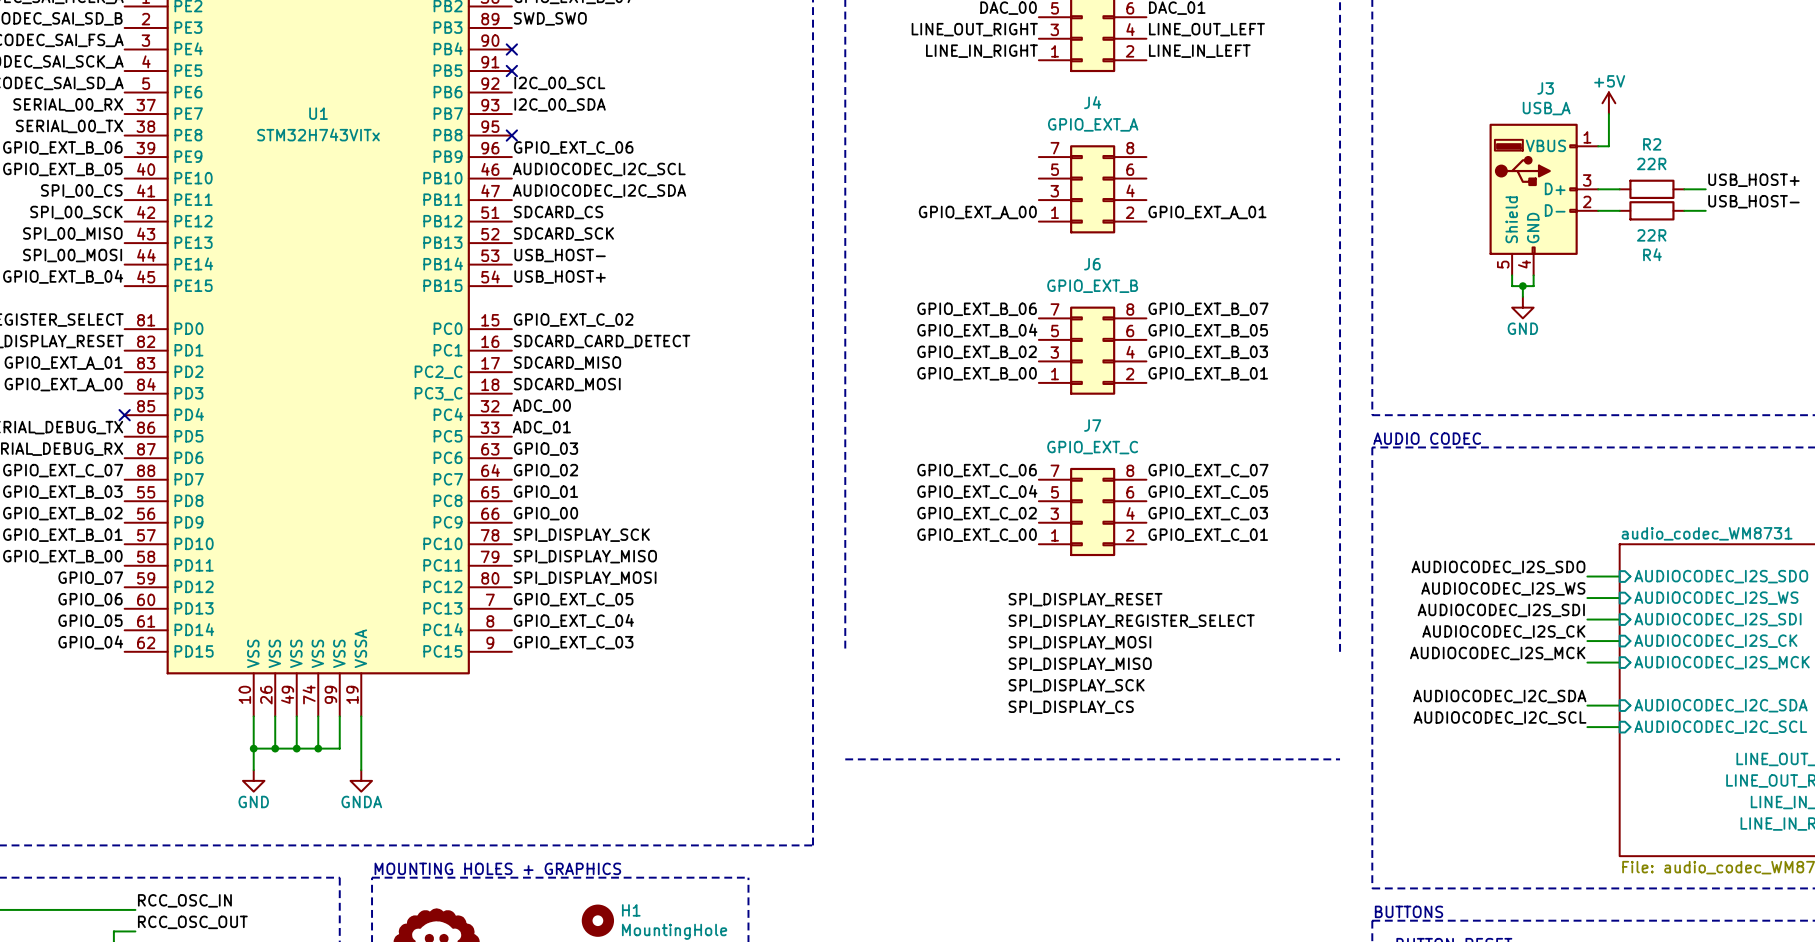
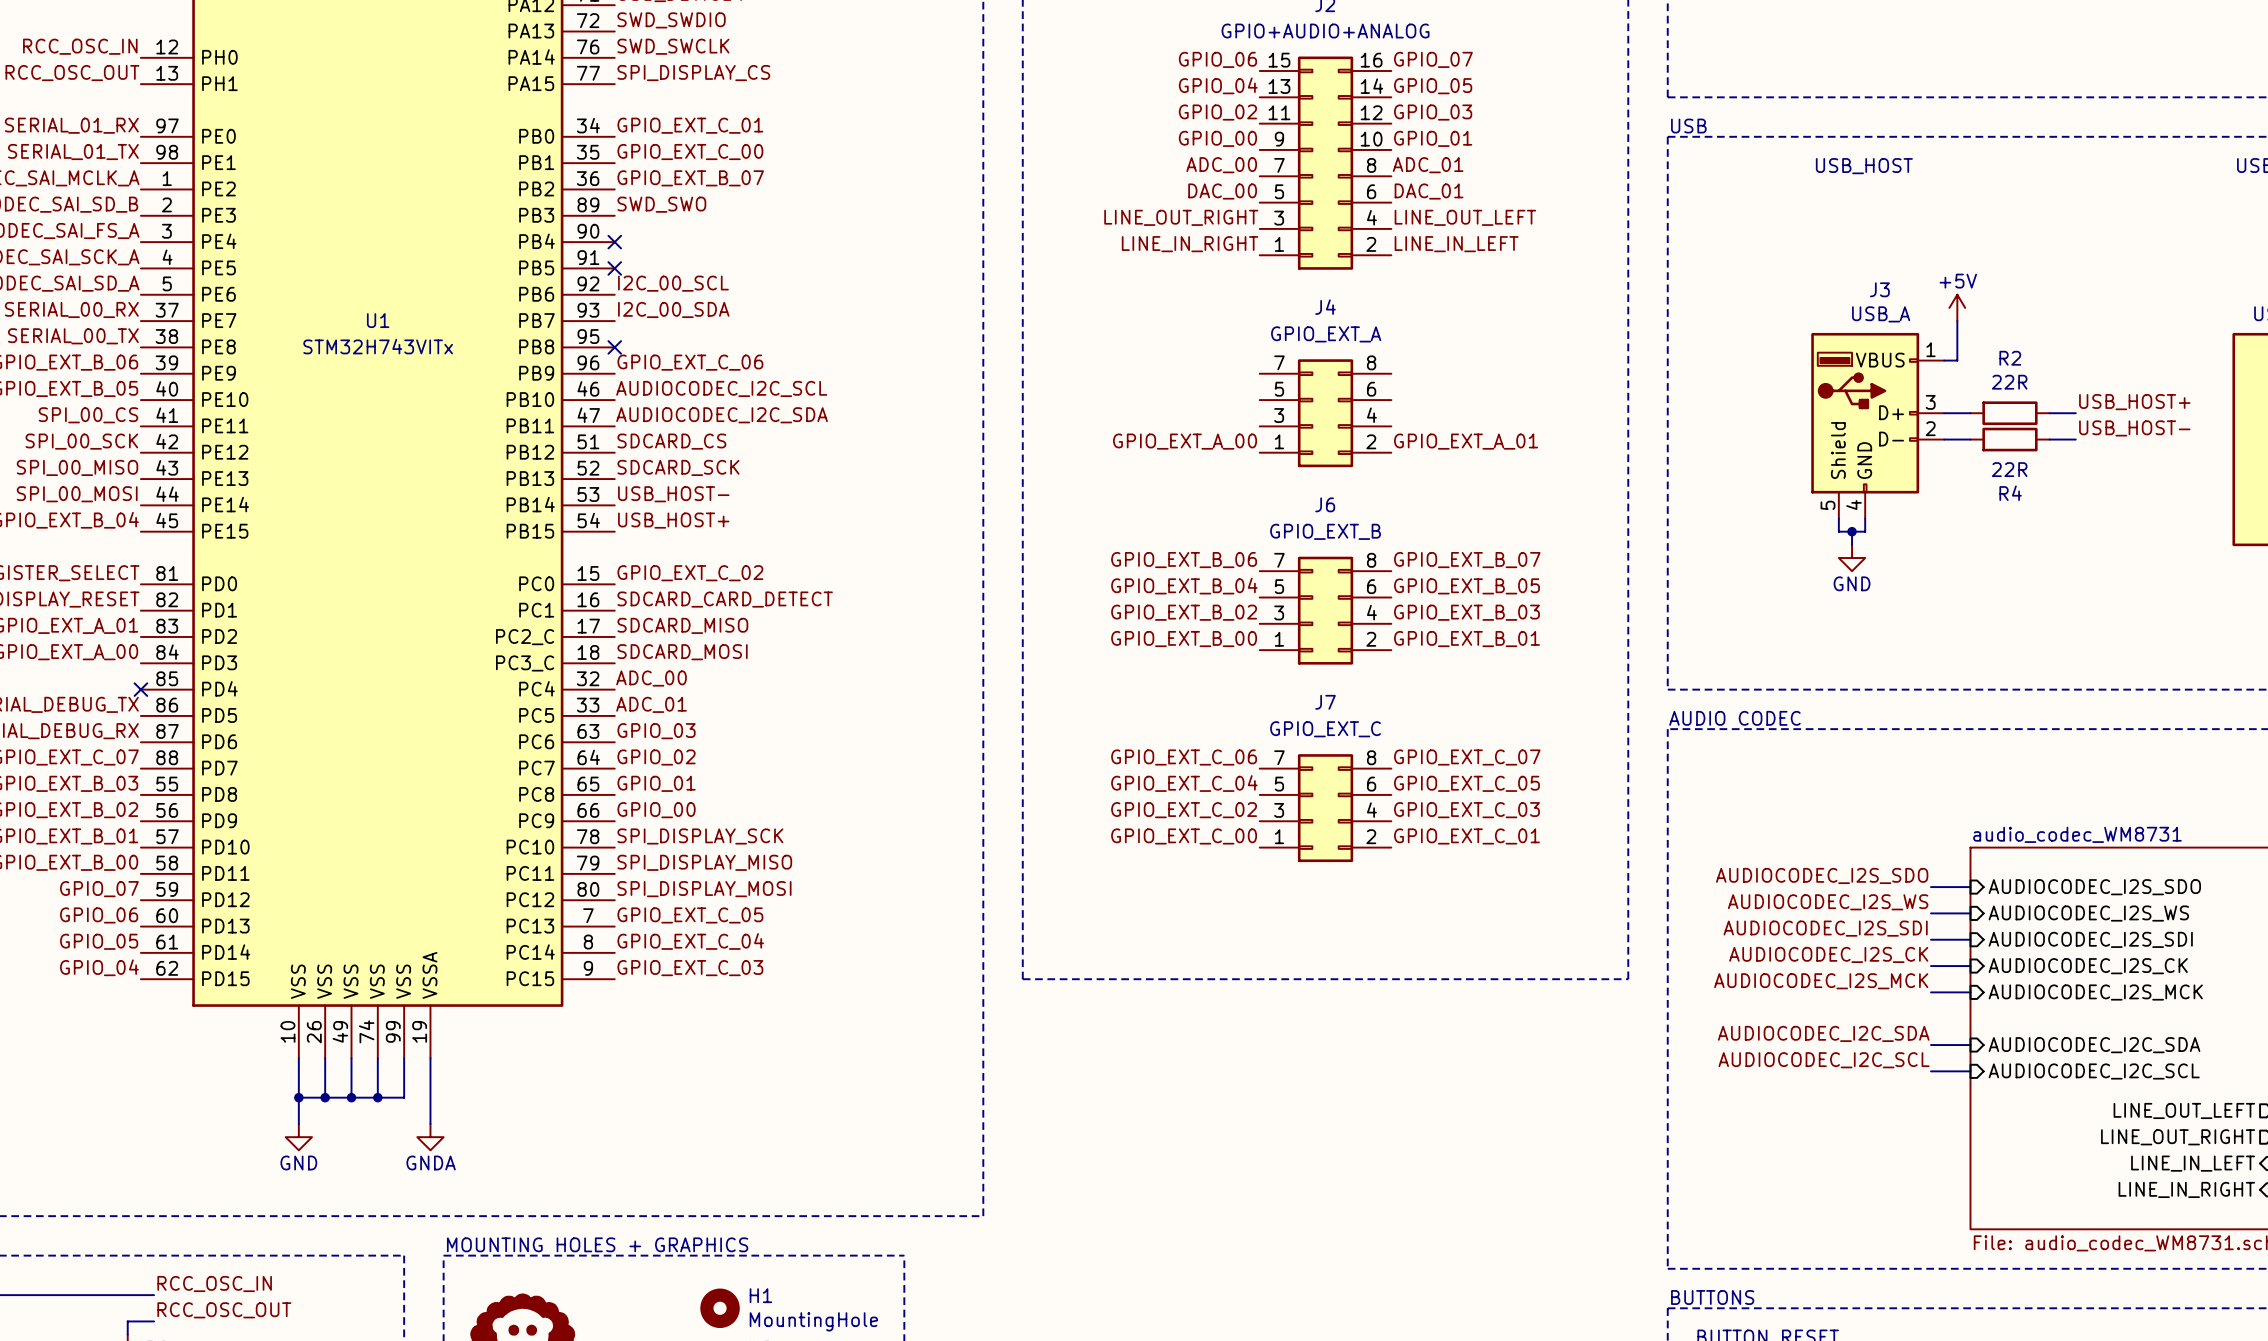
label: SPI_DISPLAY_RESET (1085, 599) -> none
label: SPI_DISPLAY_REGISTER_SELECT (1131, 621) -> none
label: SPI_DISPLAY_MOSI (1079, 642) -> none
label: SPI_DISPLAY_MISO (1080, 664) -> none
label: SPI_DISPLAY_SCK (1076, 685) -> none
label: SPI_DISPLAY_CS (1071, 707) -> none
line: (845, 759) (1340, 759) -> (1022, 979) (1628, 979)

